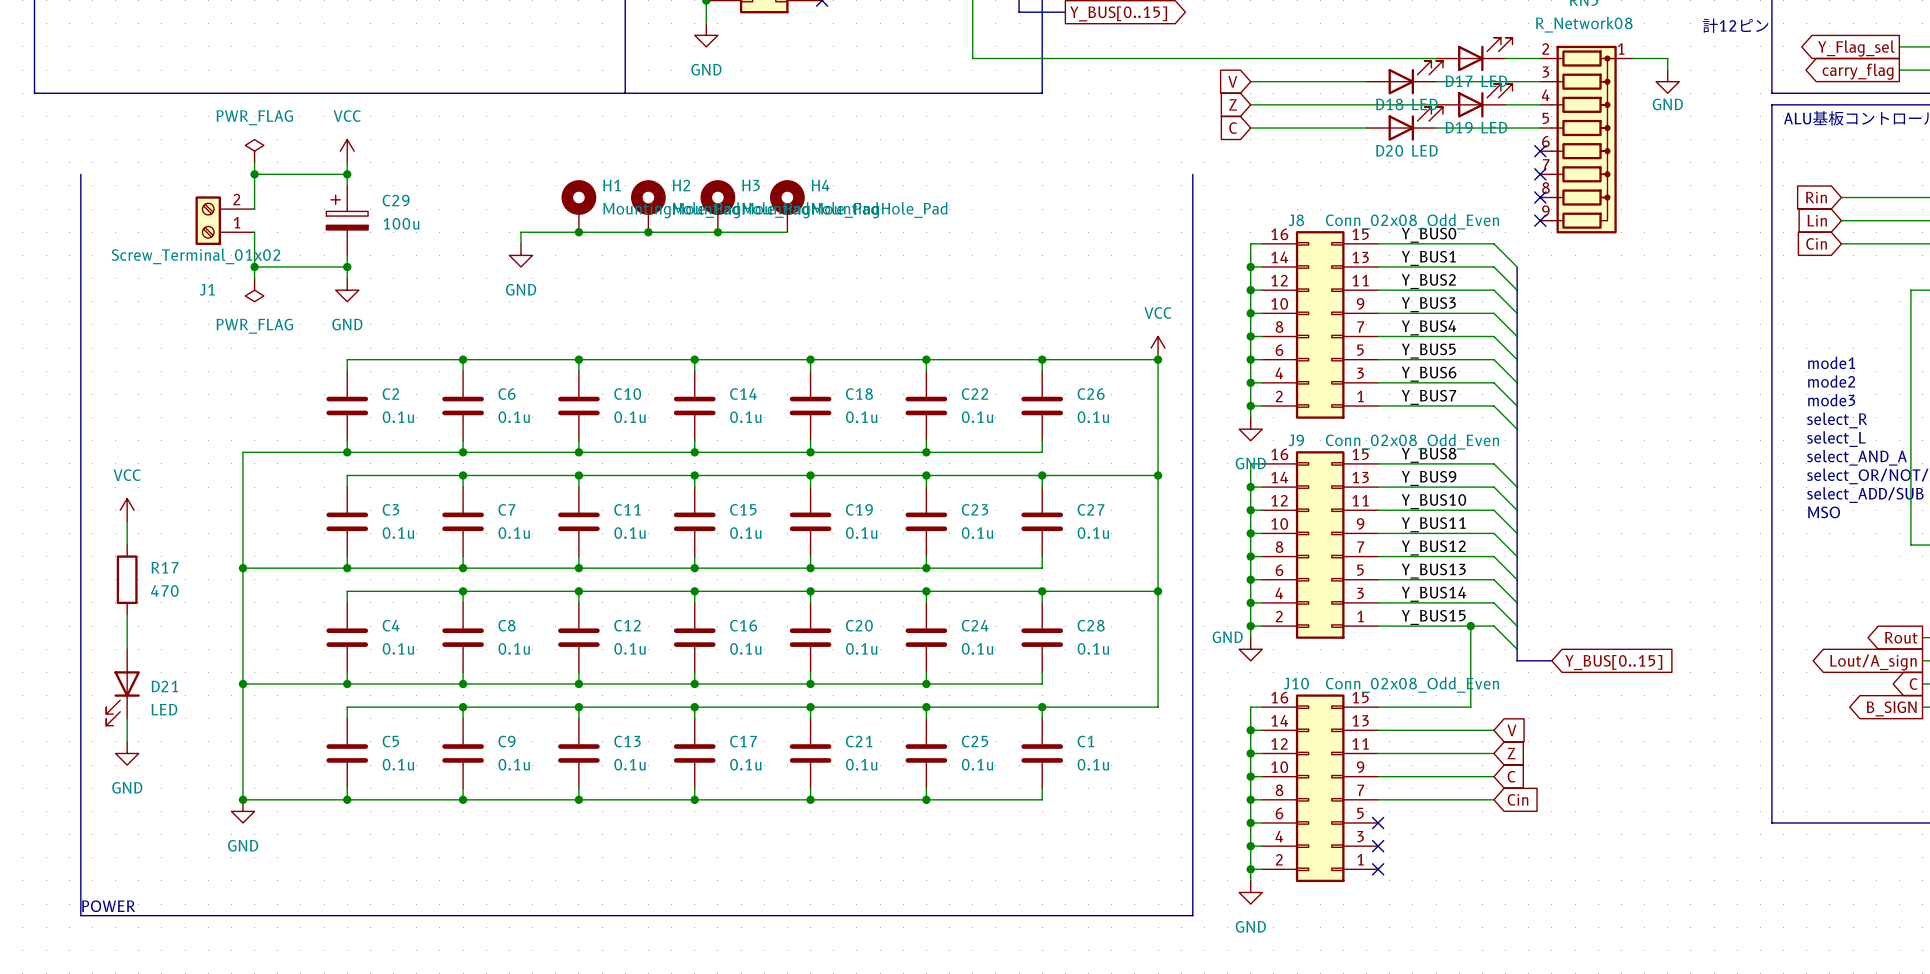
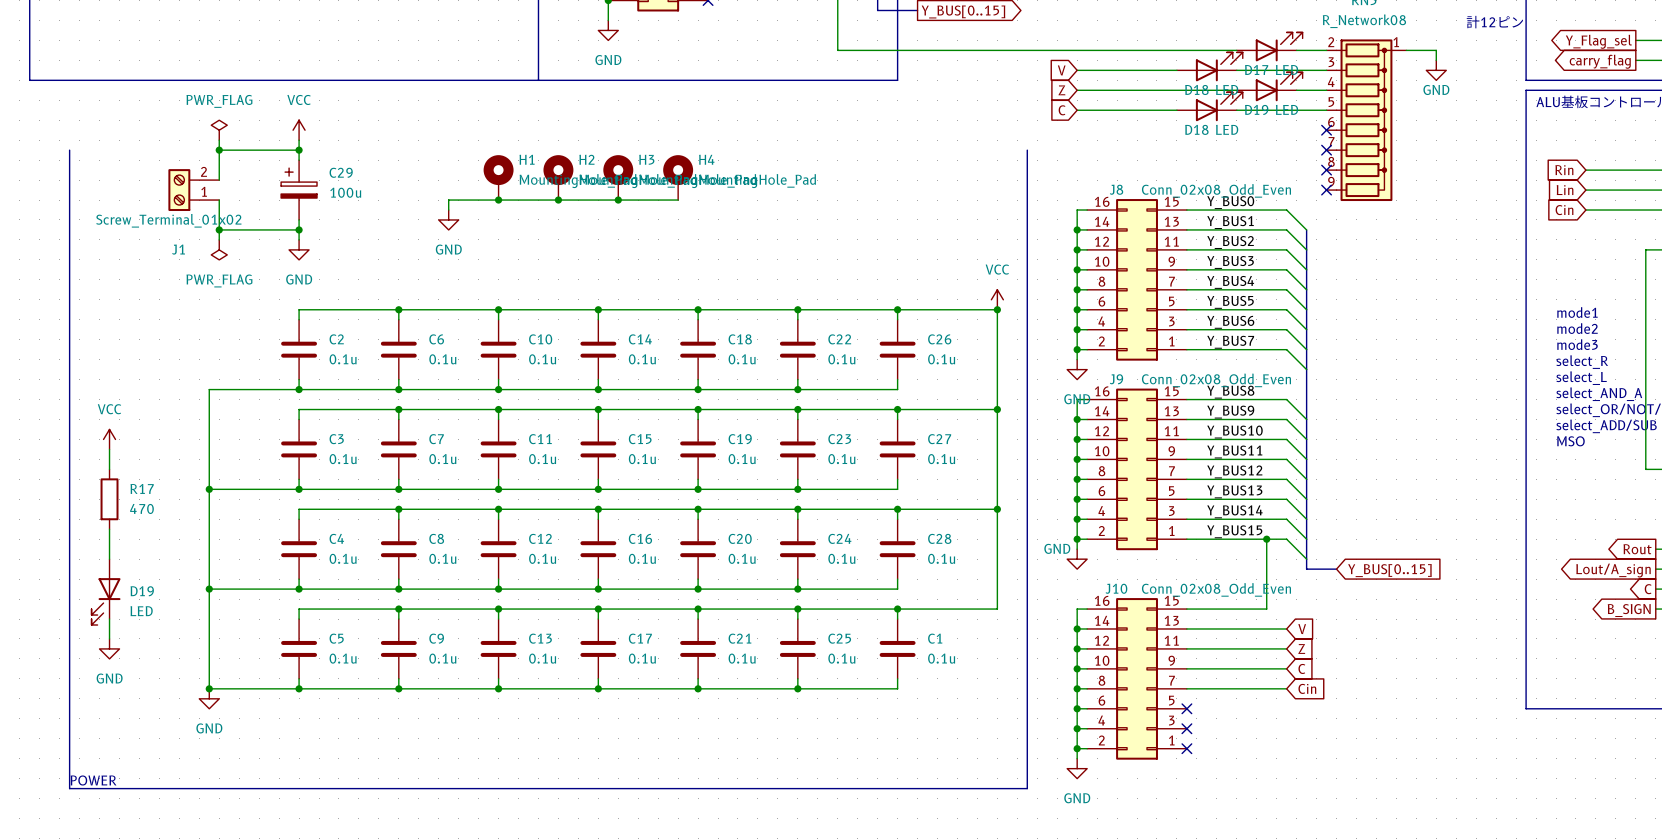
D20 name: D20 (1389, 150) -> D18 (1196, 129)
D21 name: D21 (164, 686) -> D19 (142, 591)

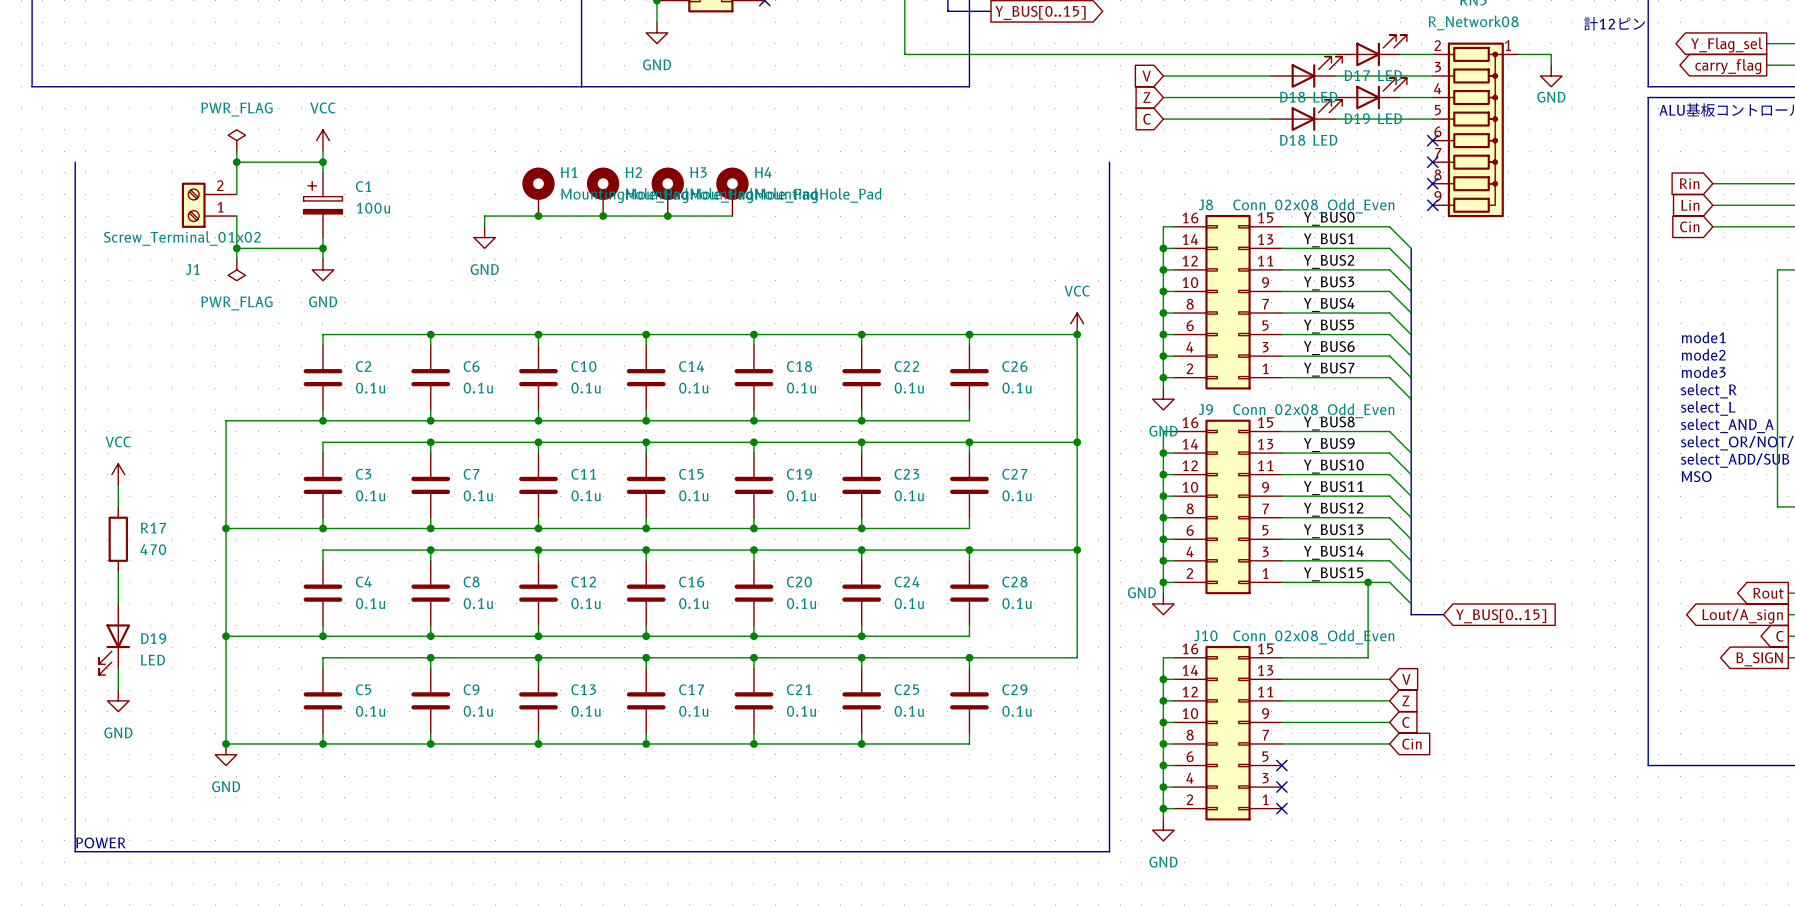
C29 name: C29 (341, 172) -> C1 (363, 186)
C1 name: C1 (935, 638) -> C29 (1014, 689)

